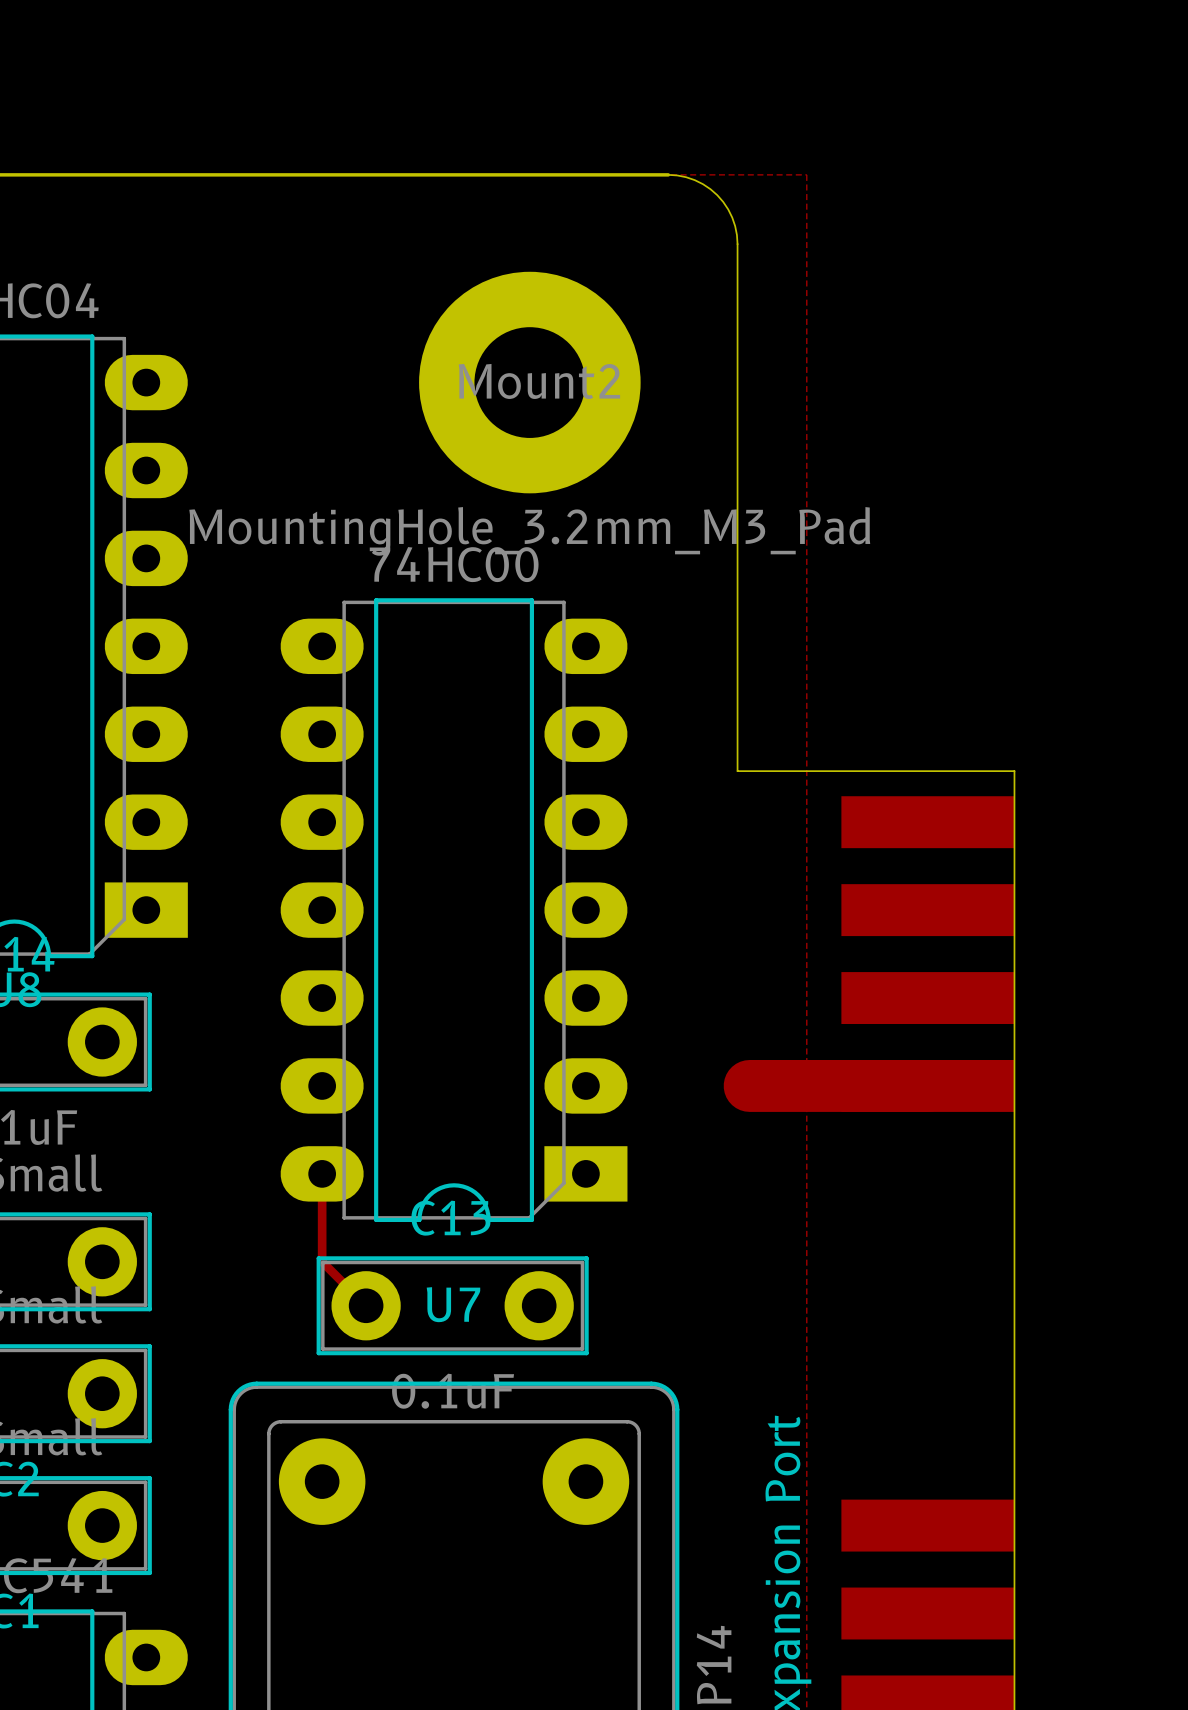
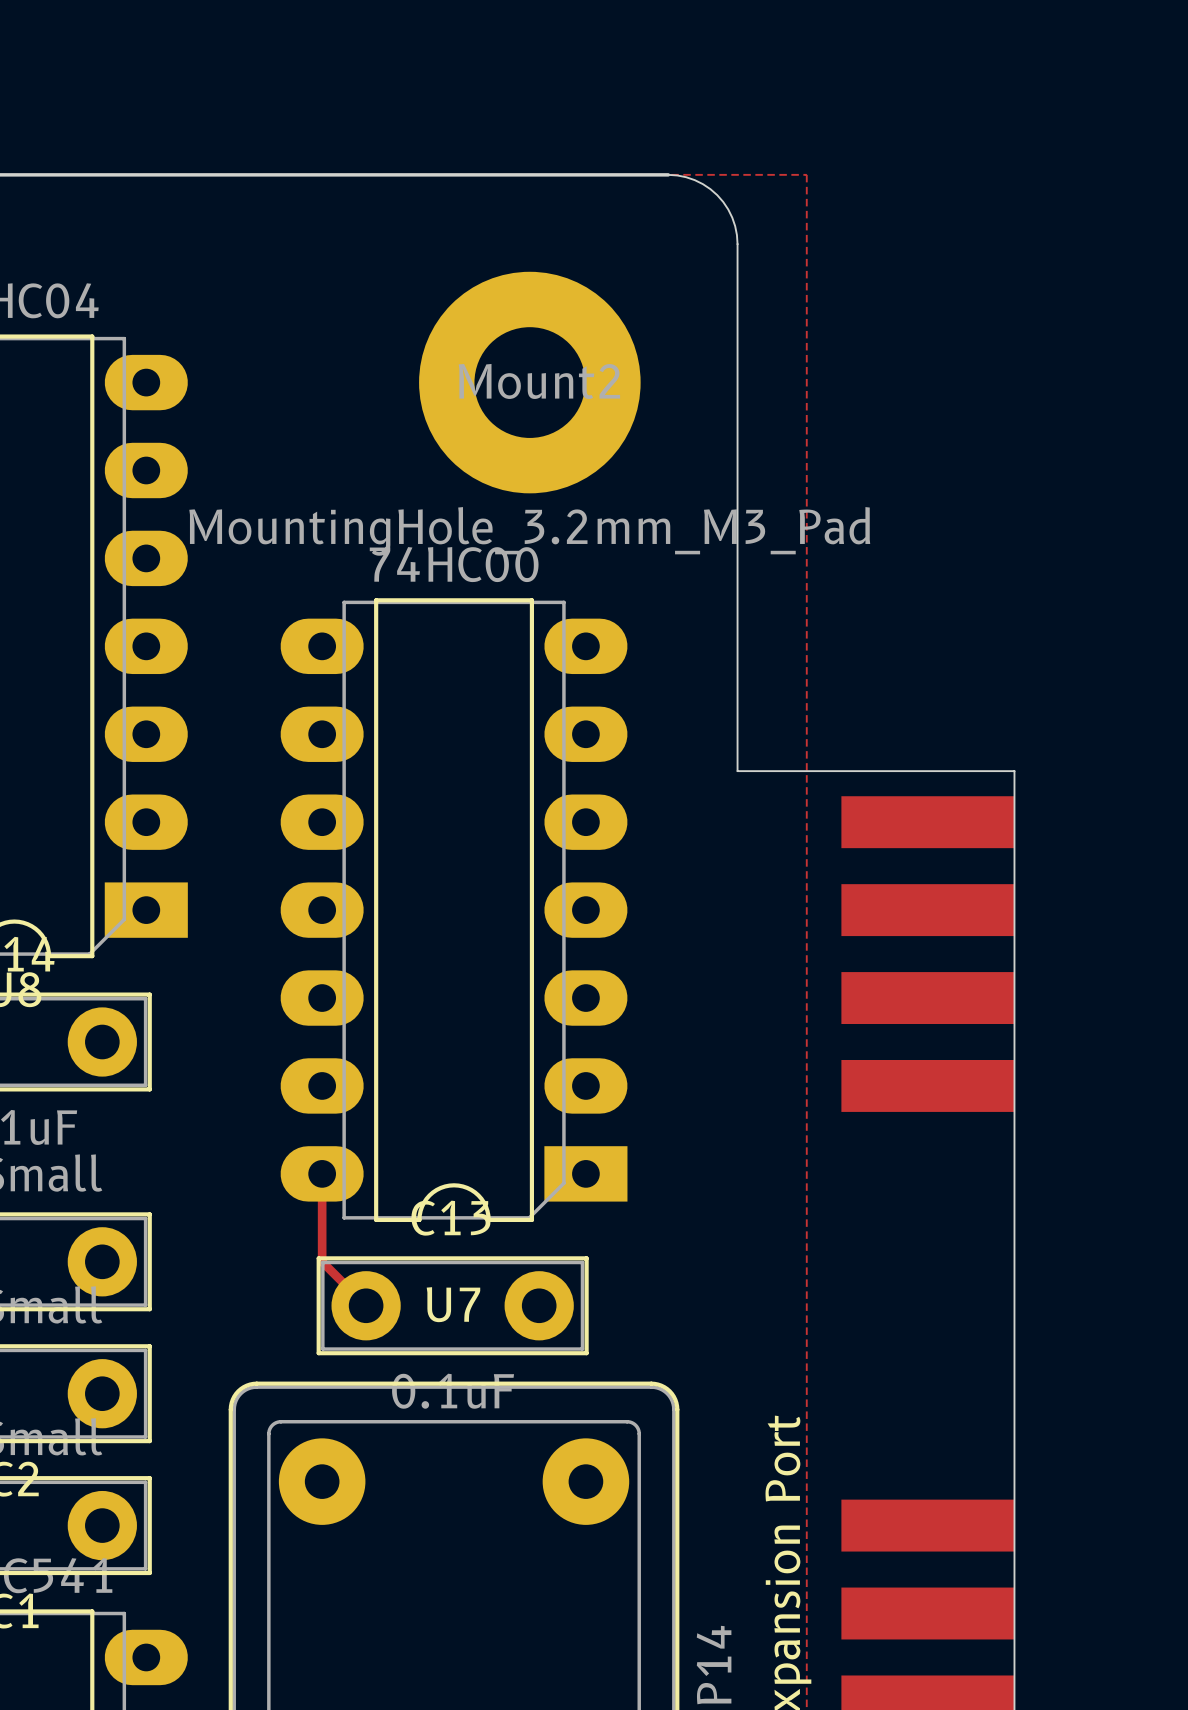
track: (749, 1085) (927, 1085) -> none

